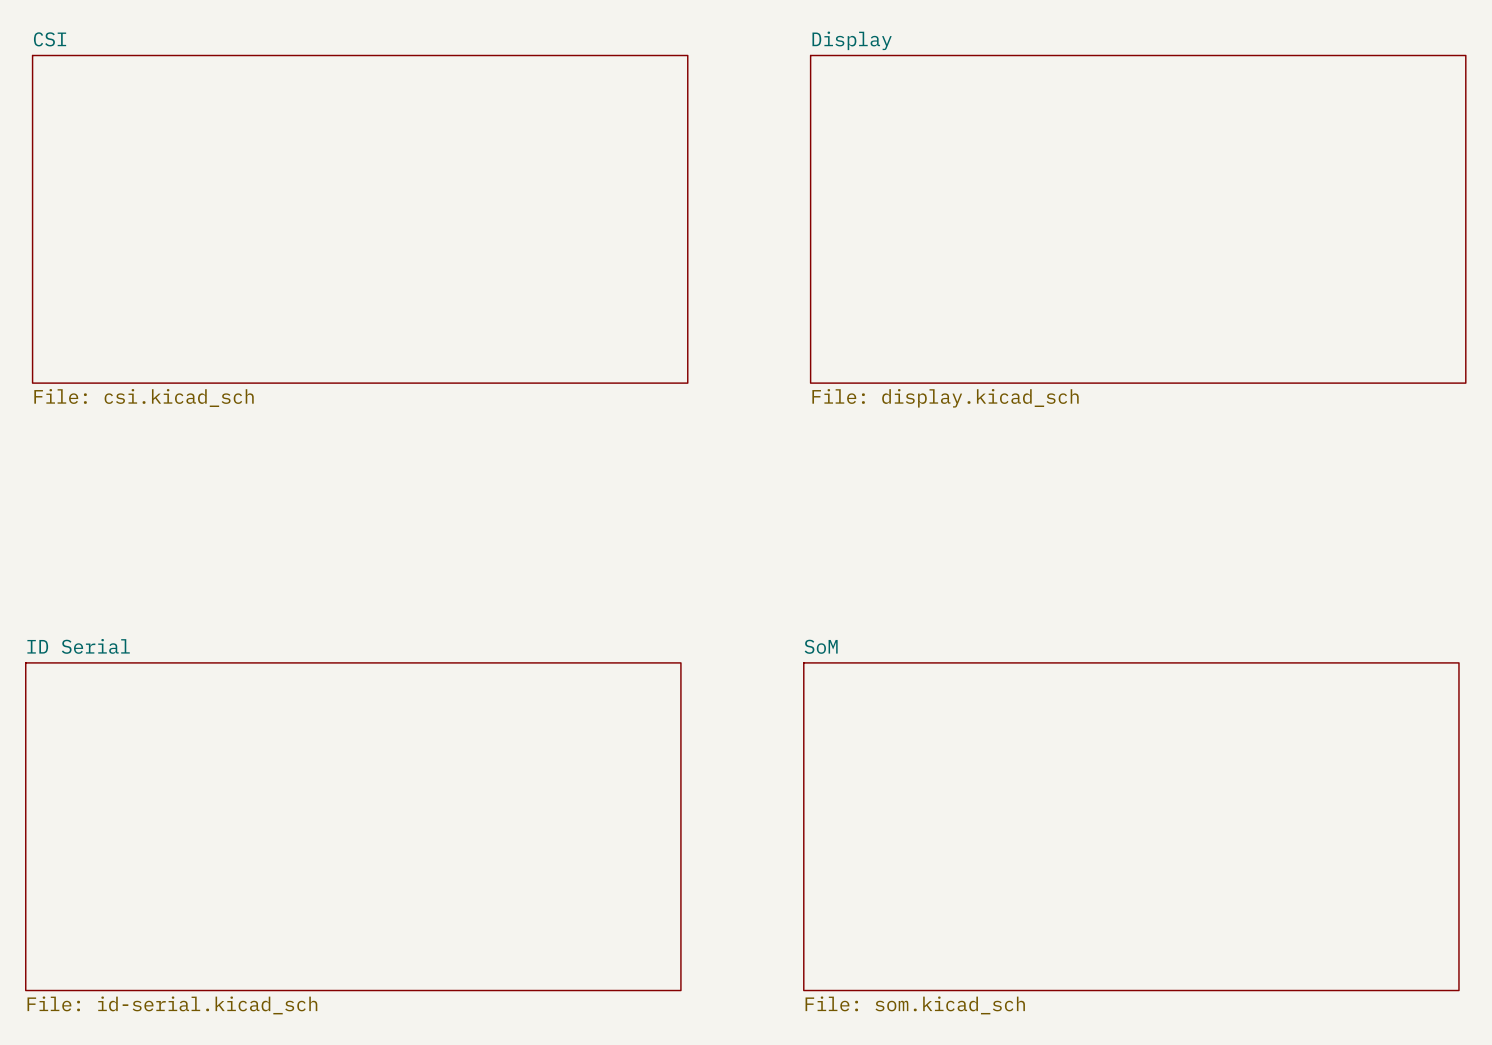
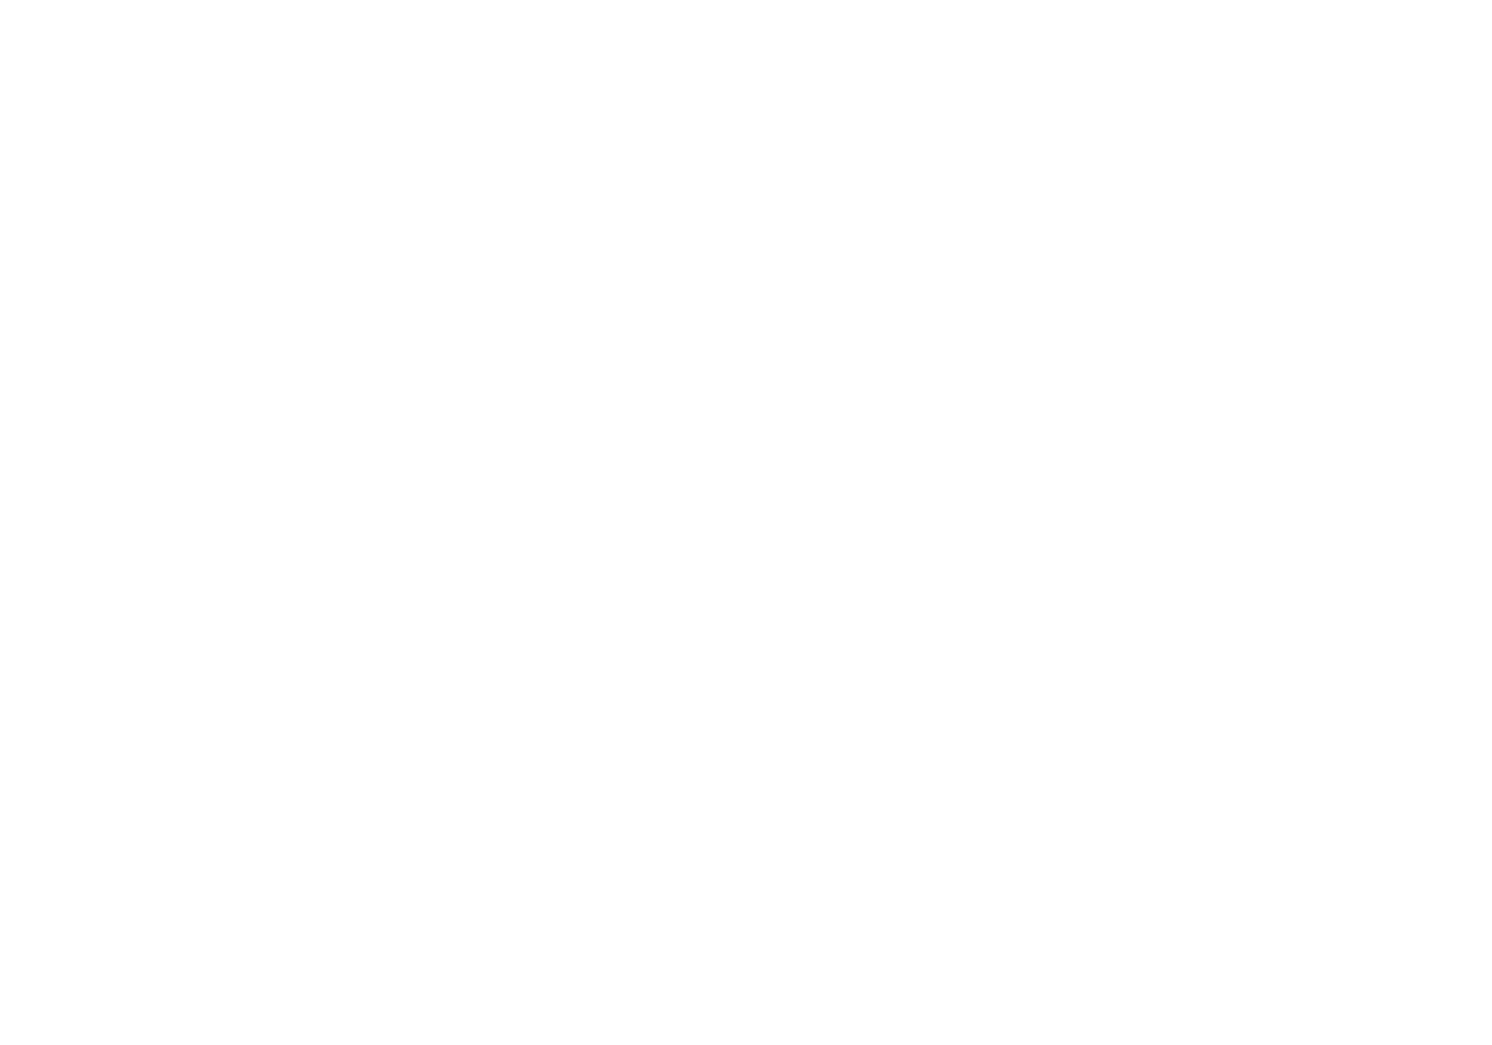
sheet CSI: File: csi.kicad_sch (360, 219) -> none
sheet Display: File: display.kicad_sch (1138, 219) -> none
sheet ID Serial: File: id-serial.kicad_sch (353, 826) -> none
sheet SoM: File: som.kicad_sch (1131, 826) -> none

